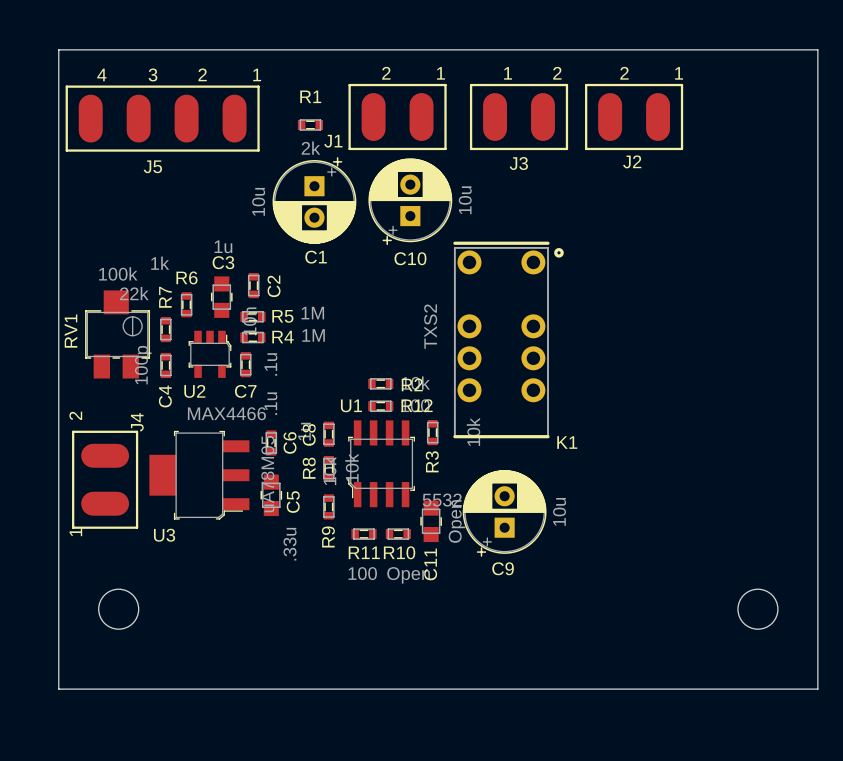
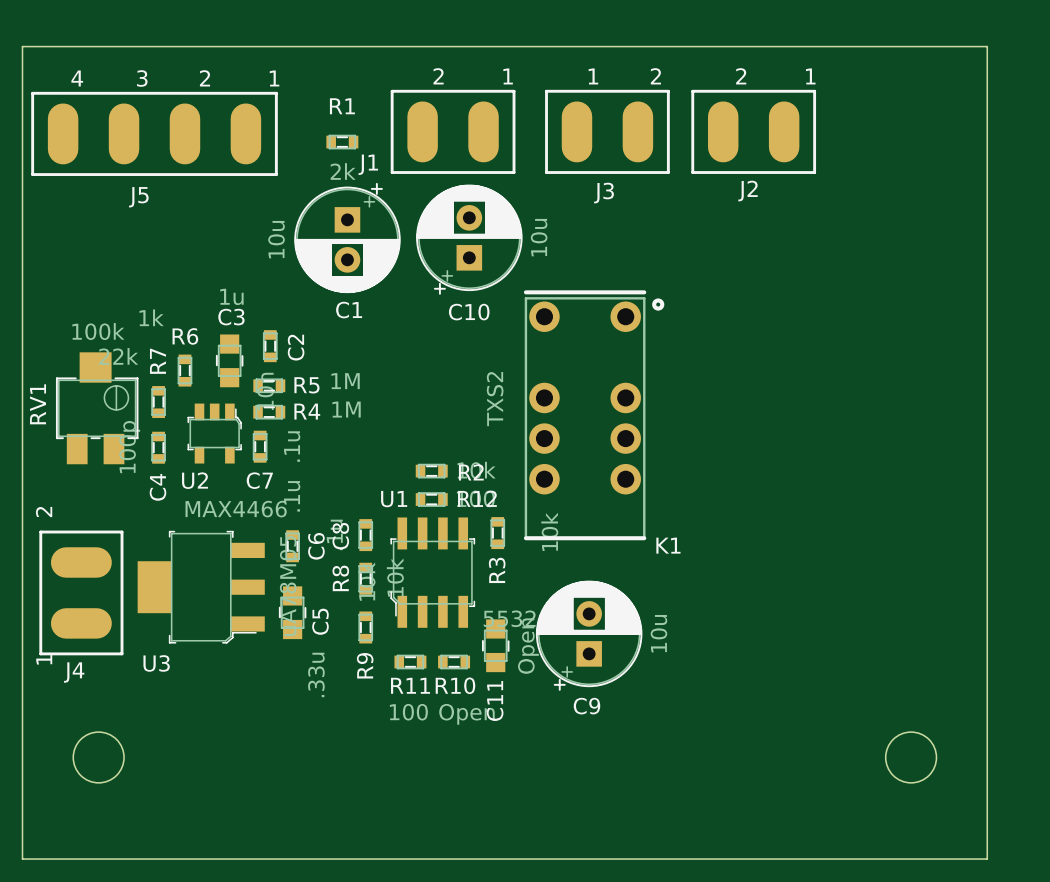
J4 name rotation: 0° (137, 422) -> 90° clockwise (74, 672)
J4 name position: J4 (137, 422) -> J4 (74, 672)

